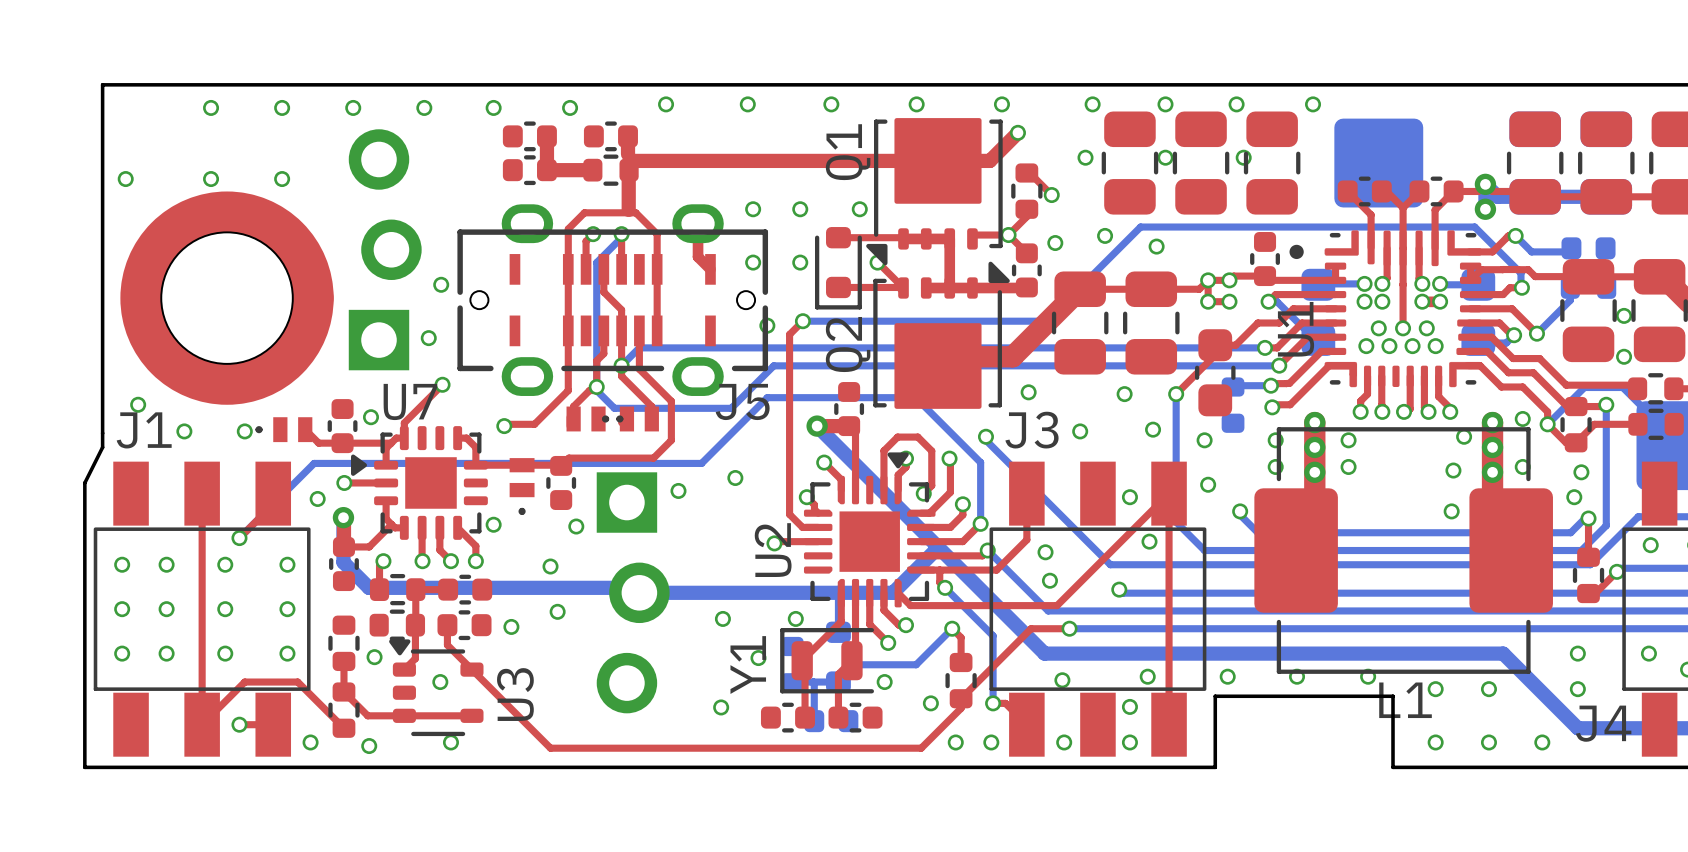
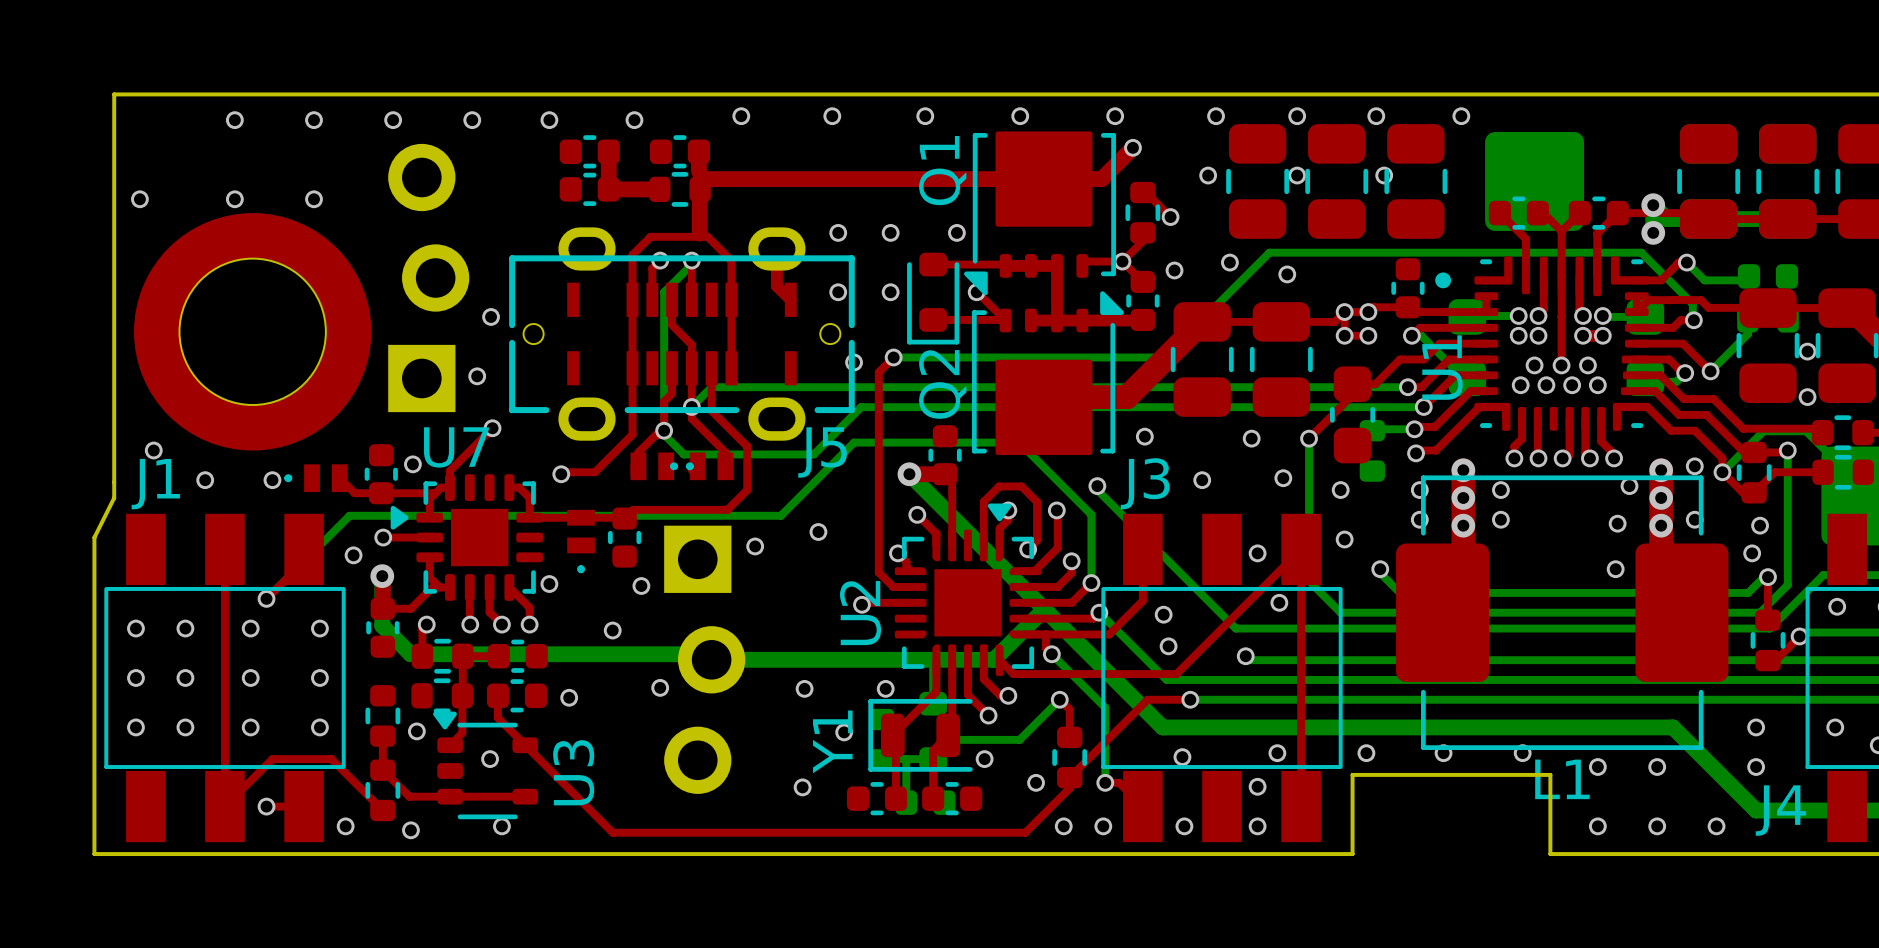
via position: (557, 611) -> (660, 687)

